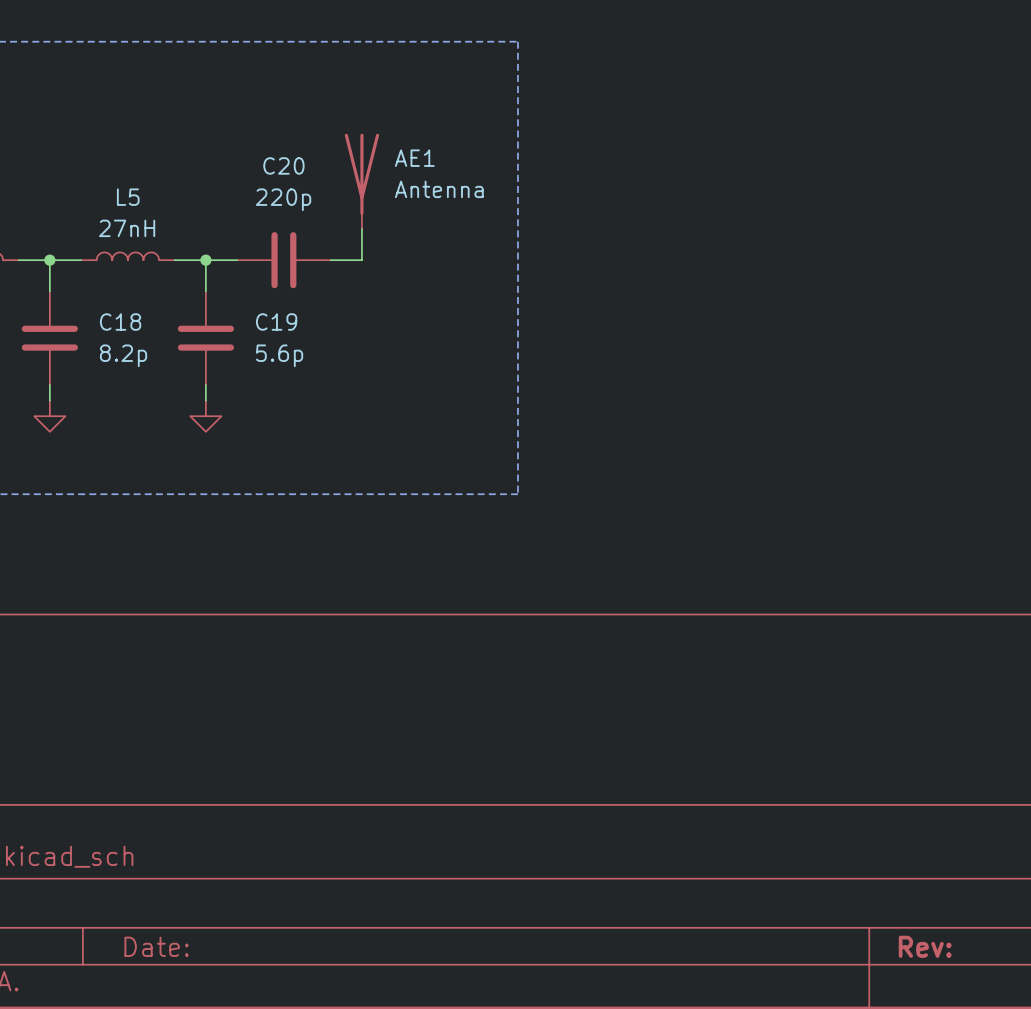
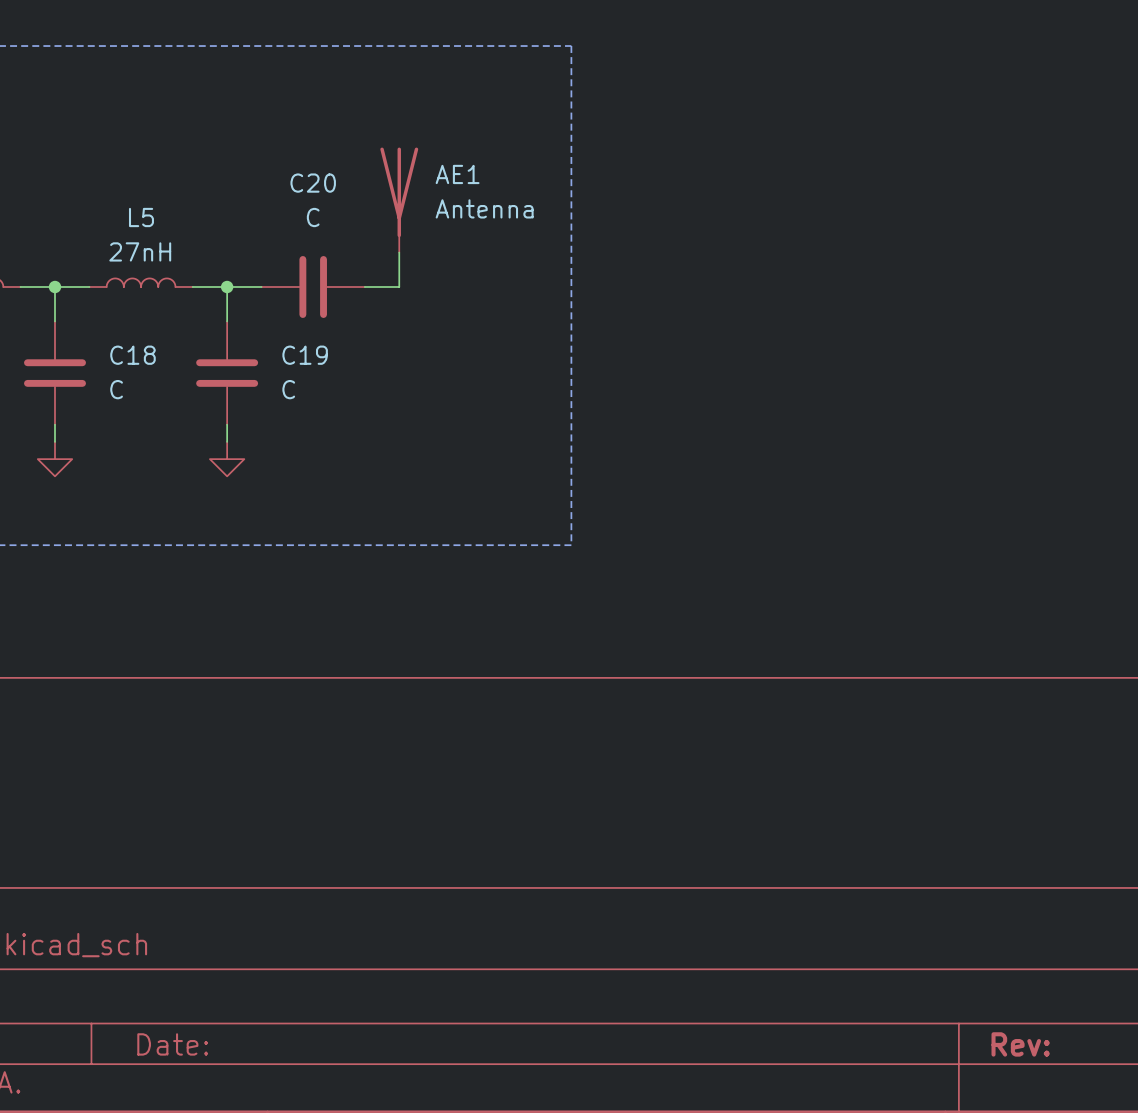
C20 value: 220p (283, 199) -> C (313, 217)
C18 value: 8.2p (123, 355) -> C (116, 389)
C19 value: 5.6p (279, 355) -> C (288, 389)

